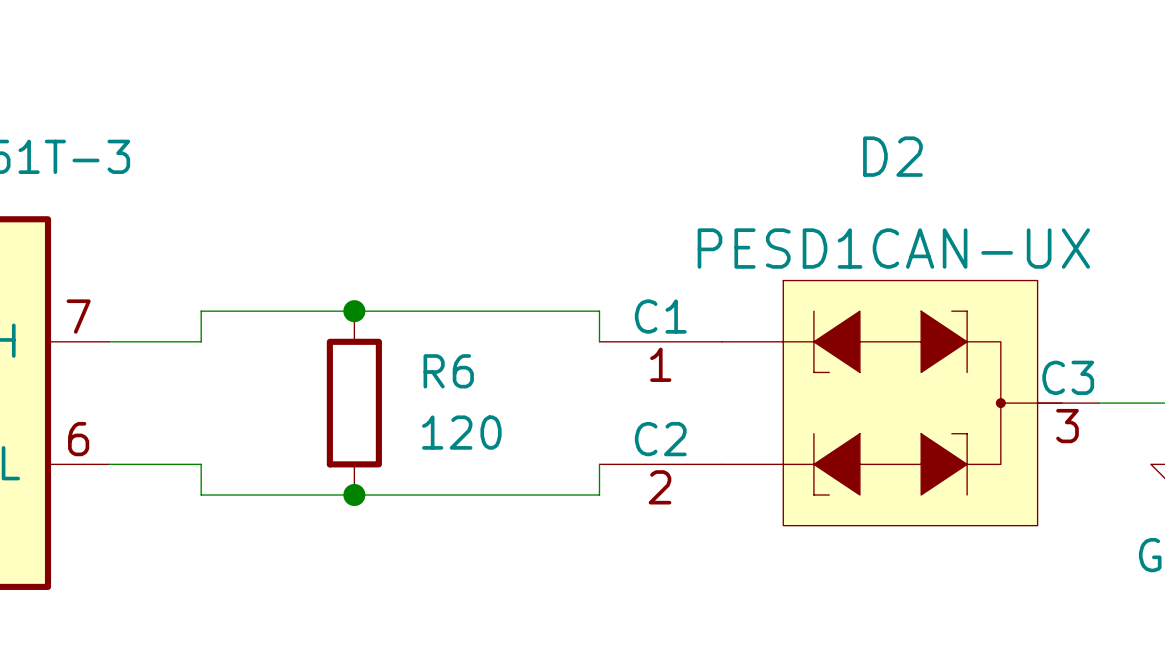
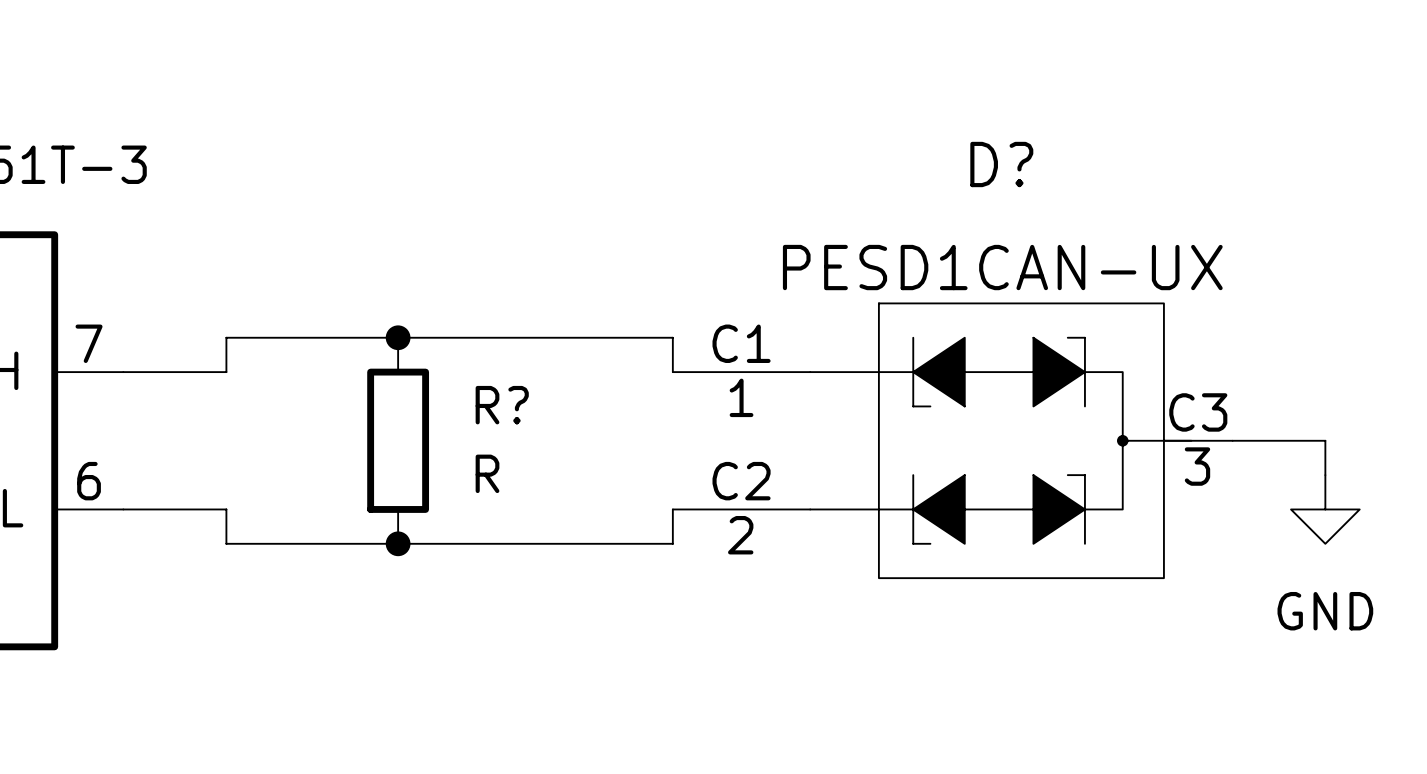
D2 name: D2 (892, 156) -> D? (1001, 164)
R6 name: R6 (448, 371) -> R? (502, 405)
R6 value: 120 (461, 432) -> R (487, 473)

